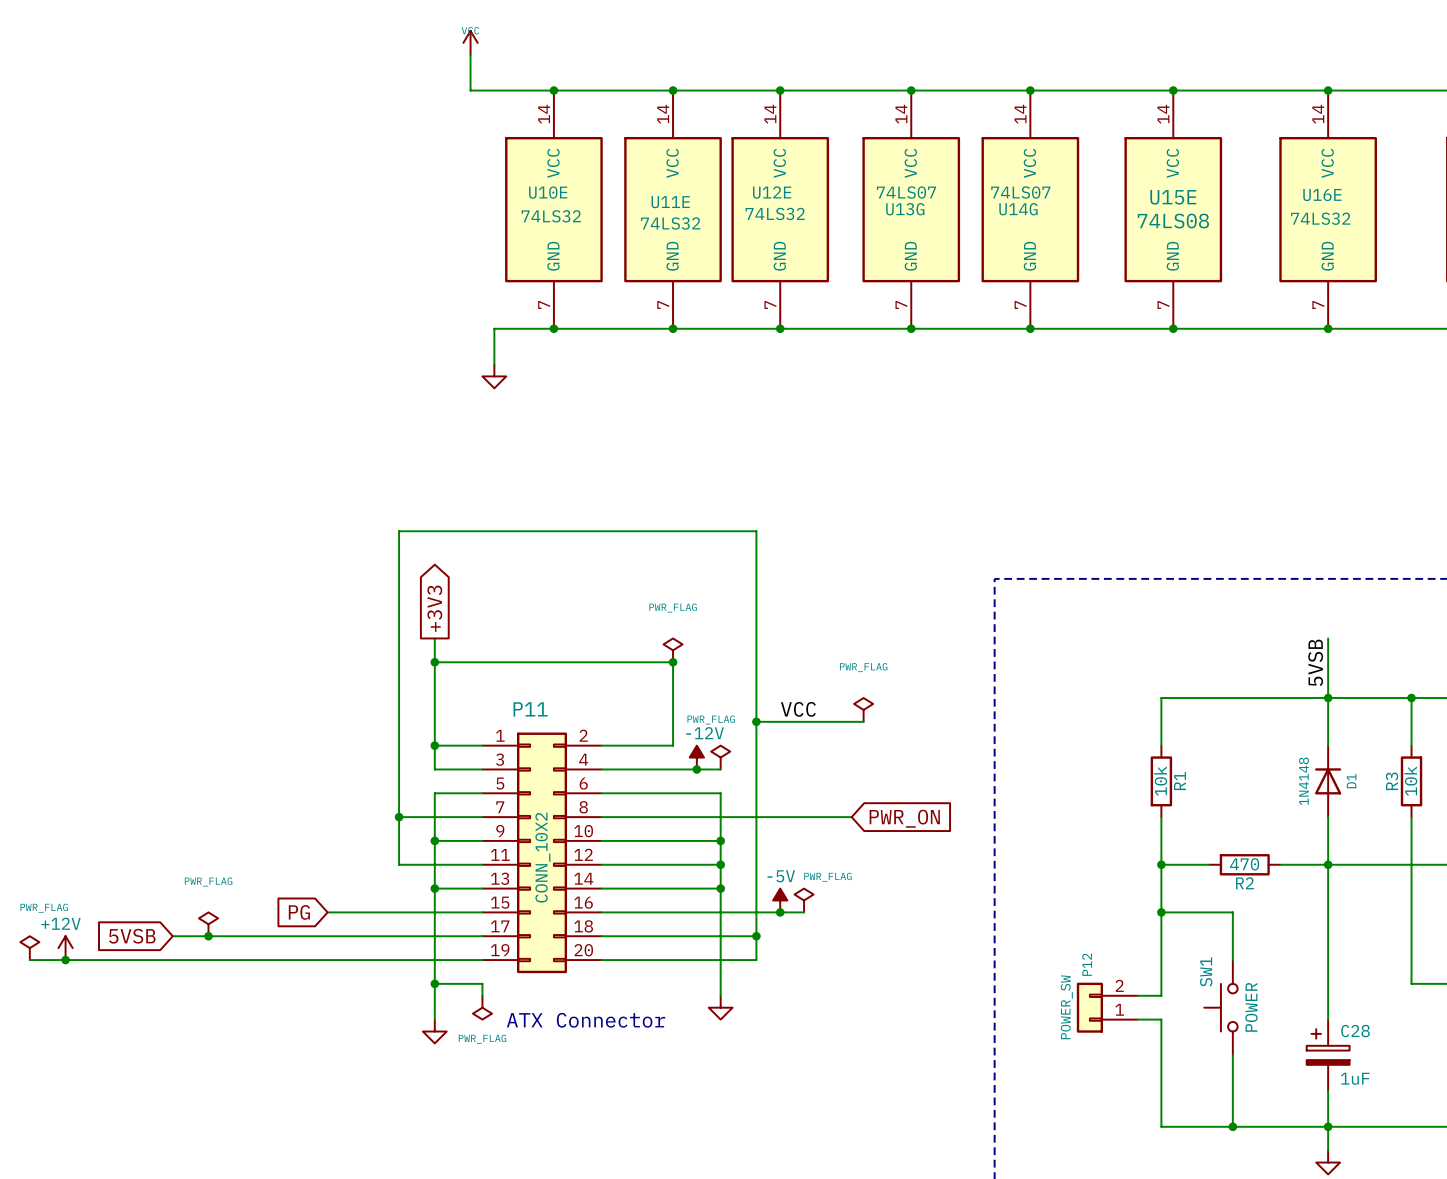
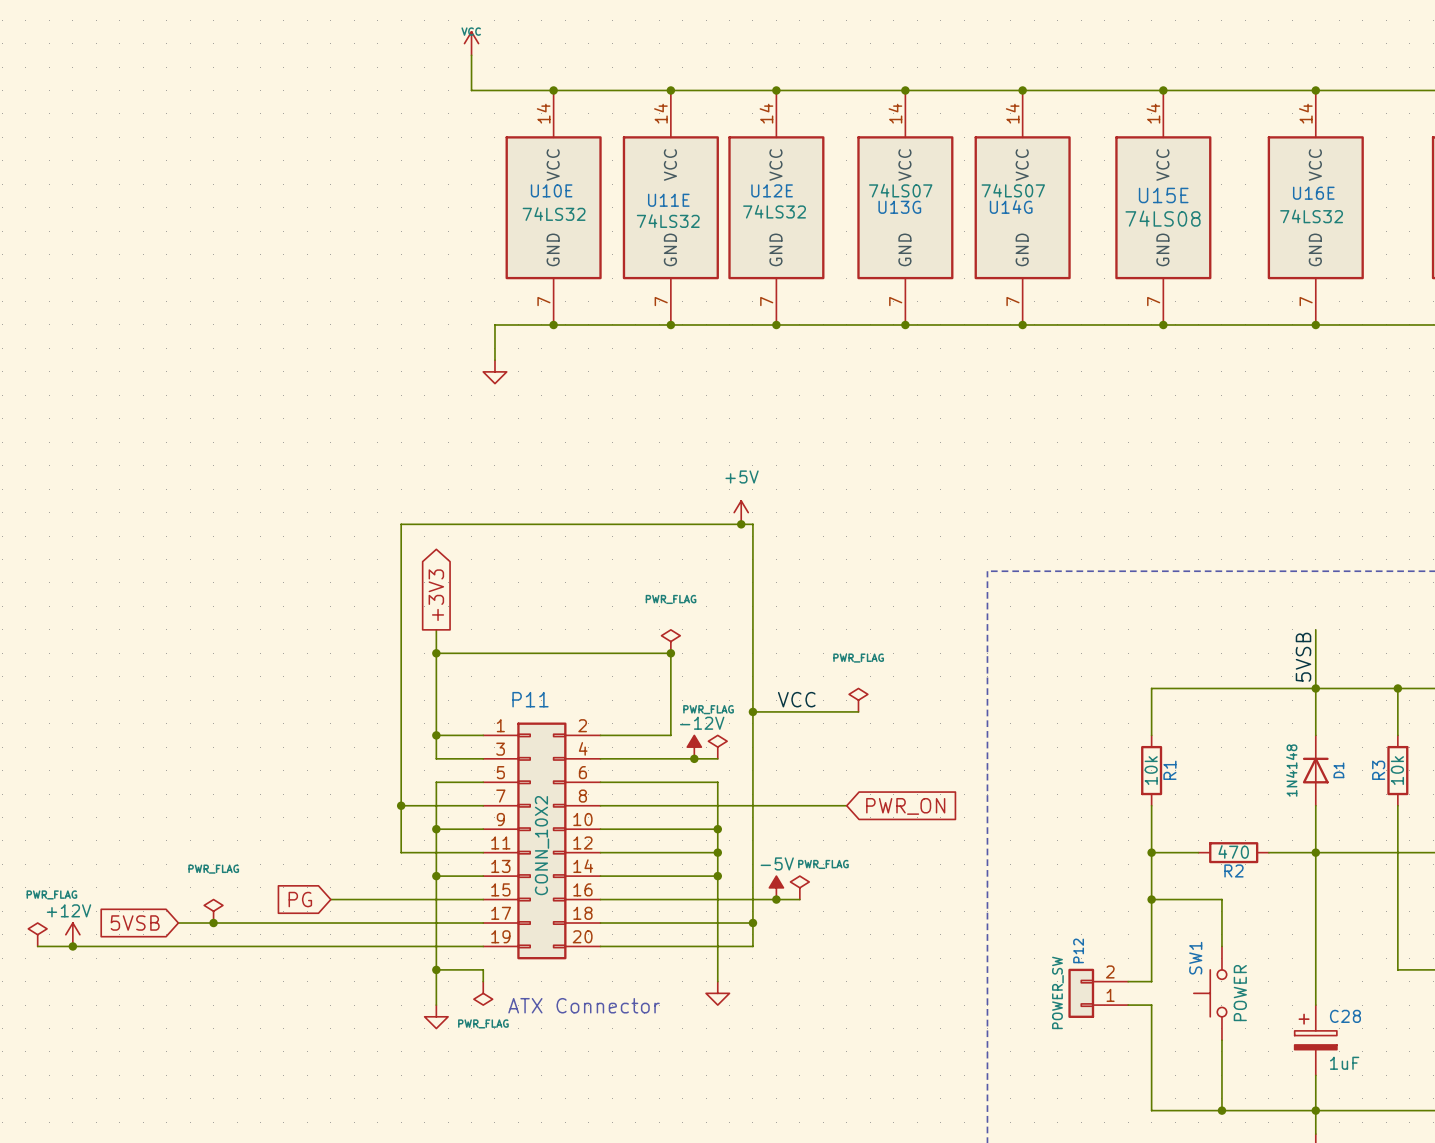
power symbol: none -> +5V (741, 512)
junction: none -> (741, 524)

